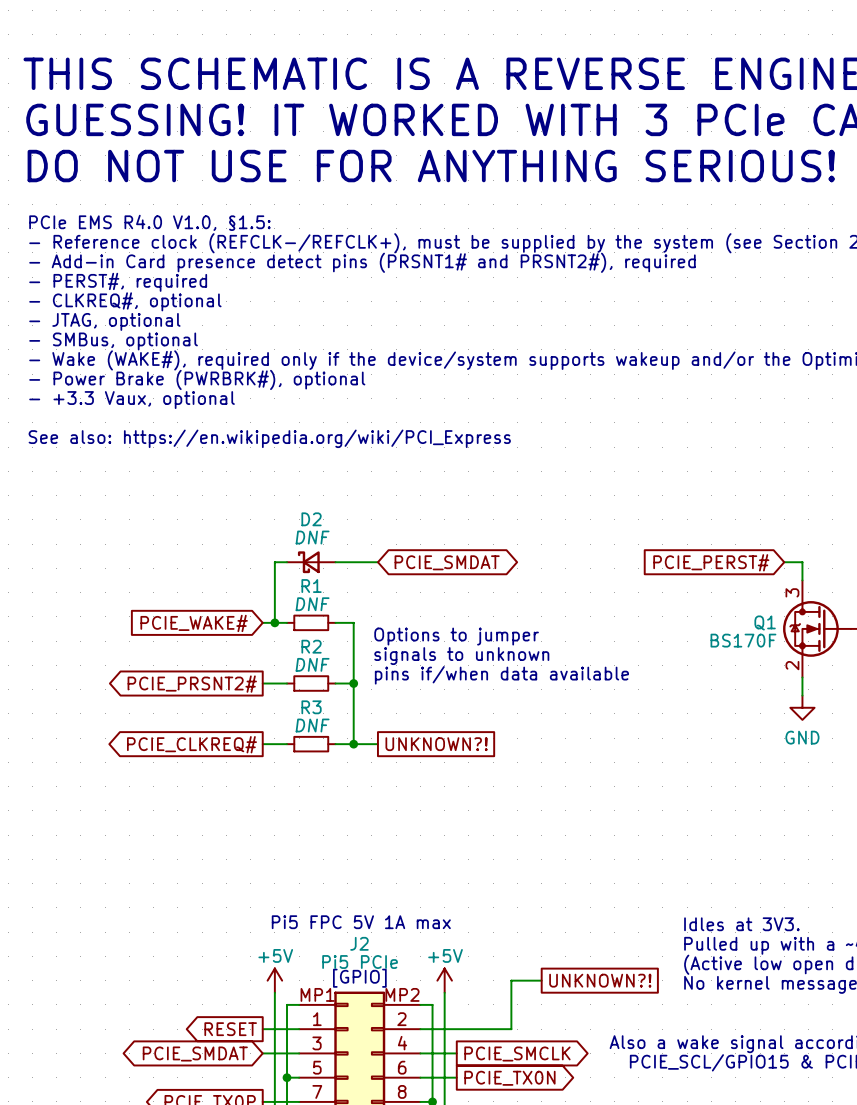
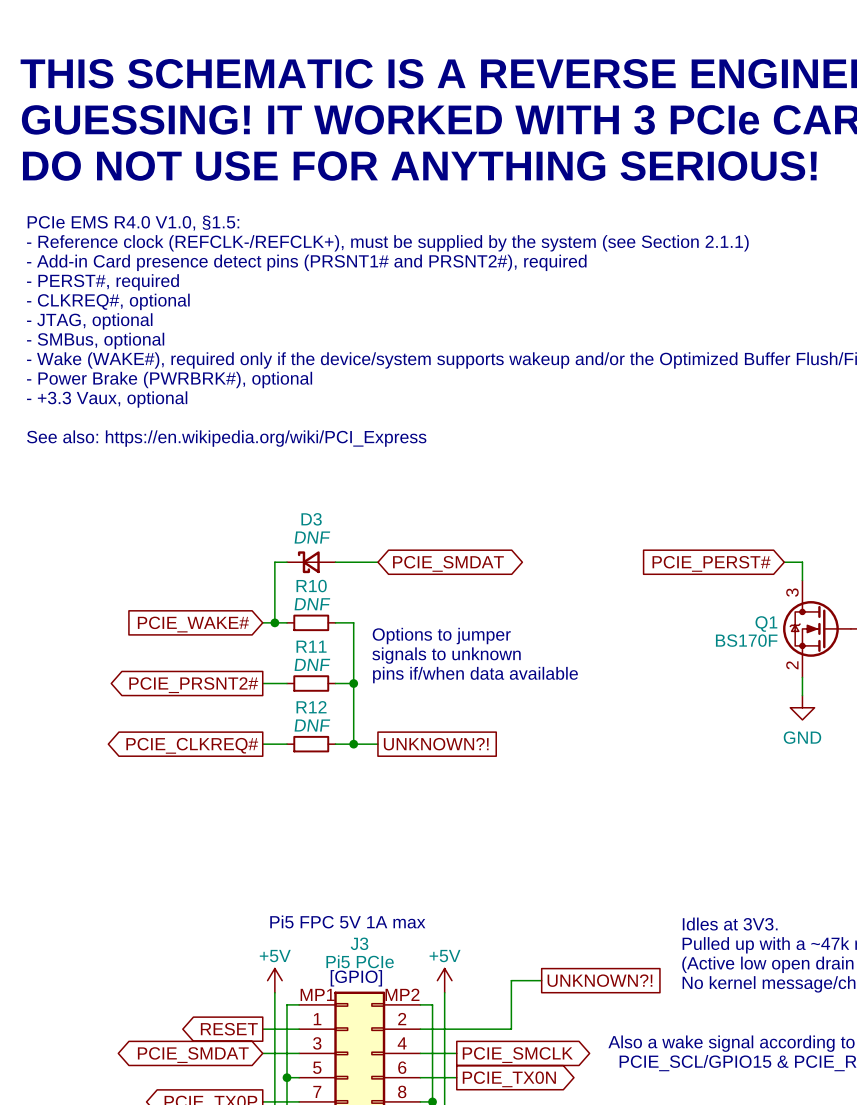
D2 name: D2 (311, 519) -> D3 (311, 519)
R1 name: R1 (311, 586) -> R10 (311, 586)
R2 name: R2 (311, 646) -> R11 (311, 646)
R3 name: R3 (311, 707) -> R12 (311, 707)
J2 name: J2 (359, 943) -> J3 (359, 943)

